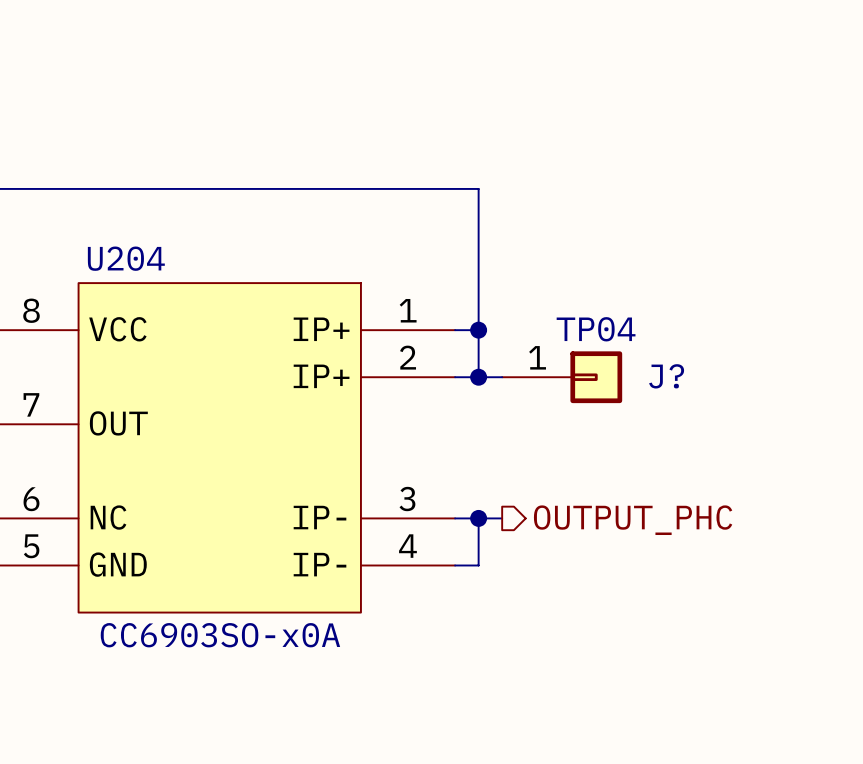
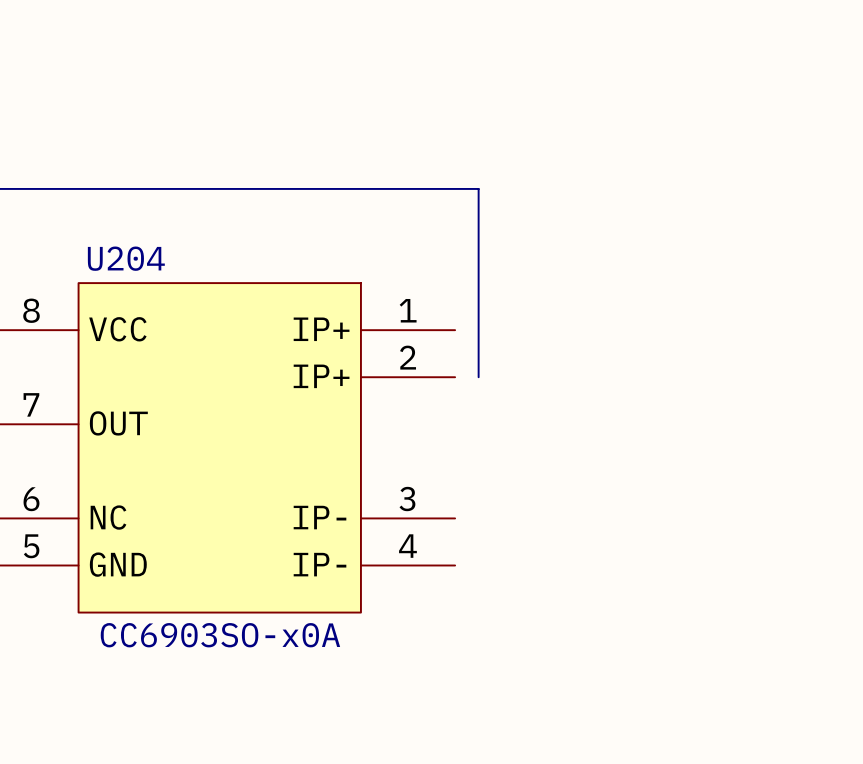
wire: (455, 330) (478, 330) -> none
junction: (478, 330) -> none
wire: (455, 377) (502, 377) -> none
junction: (478, 377) -> none
J?: TP04 (562, 377) -> none
wire: (455, 518) (502, 518) -> none
wire: (478, 518) (478, 565) (455, 565) -> none
junction: (478, 518) -> none
hierarchical label: OUTPUT_PHC (633, 520) -> none

